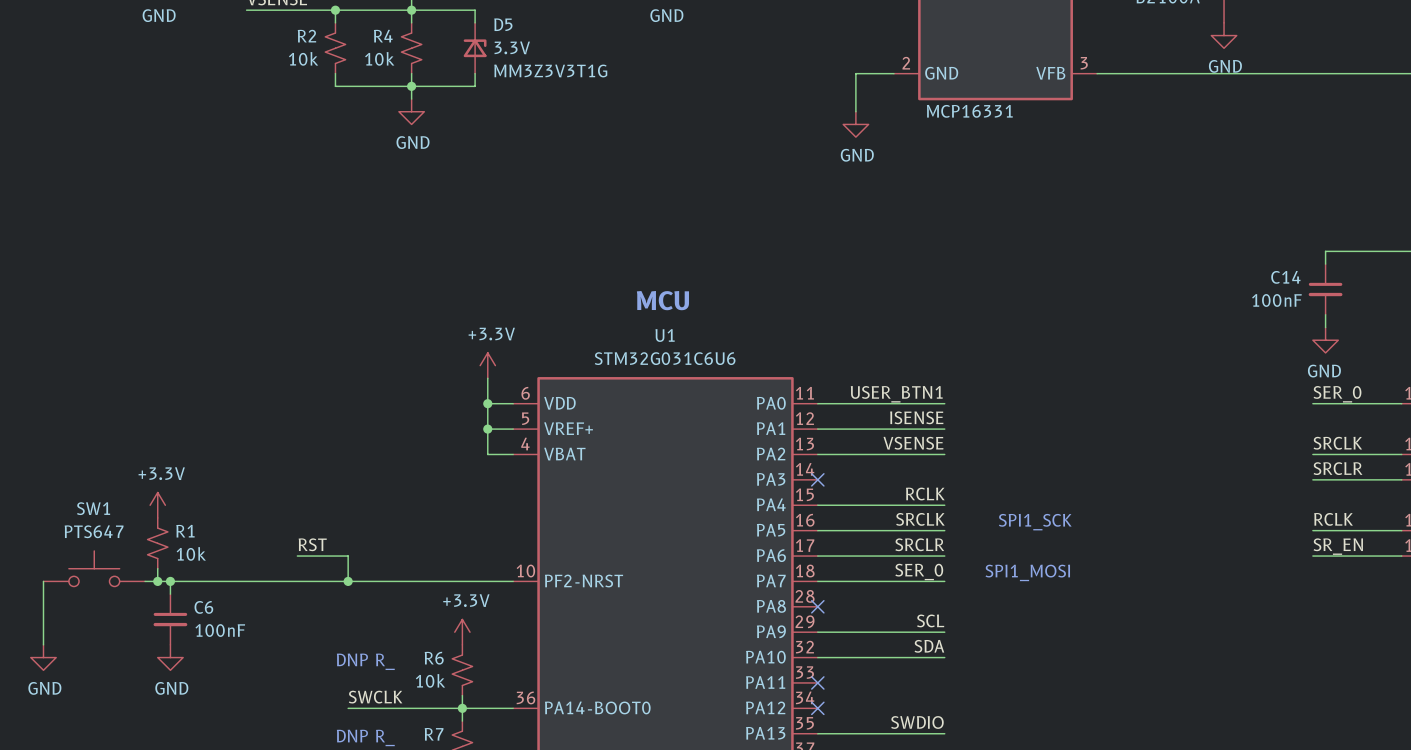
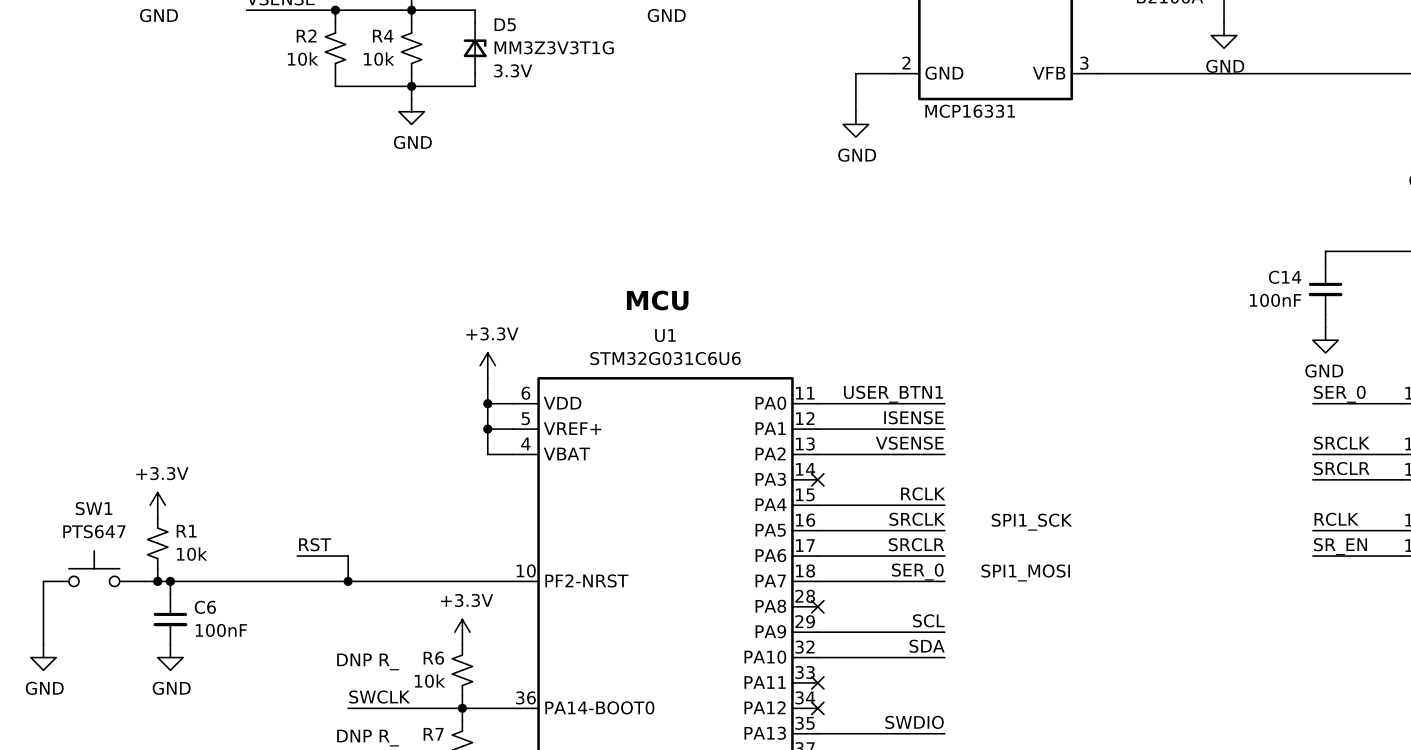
D5 value: 3.3V (512, 47) -> MM3Z3V3T1G (554, 47)
D5 text: none -> 3.3V (513, 70)
D5 text: MM3Z3V3T1G (550, 70) -> none

